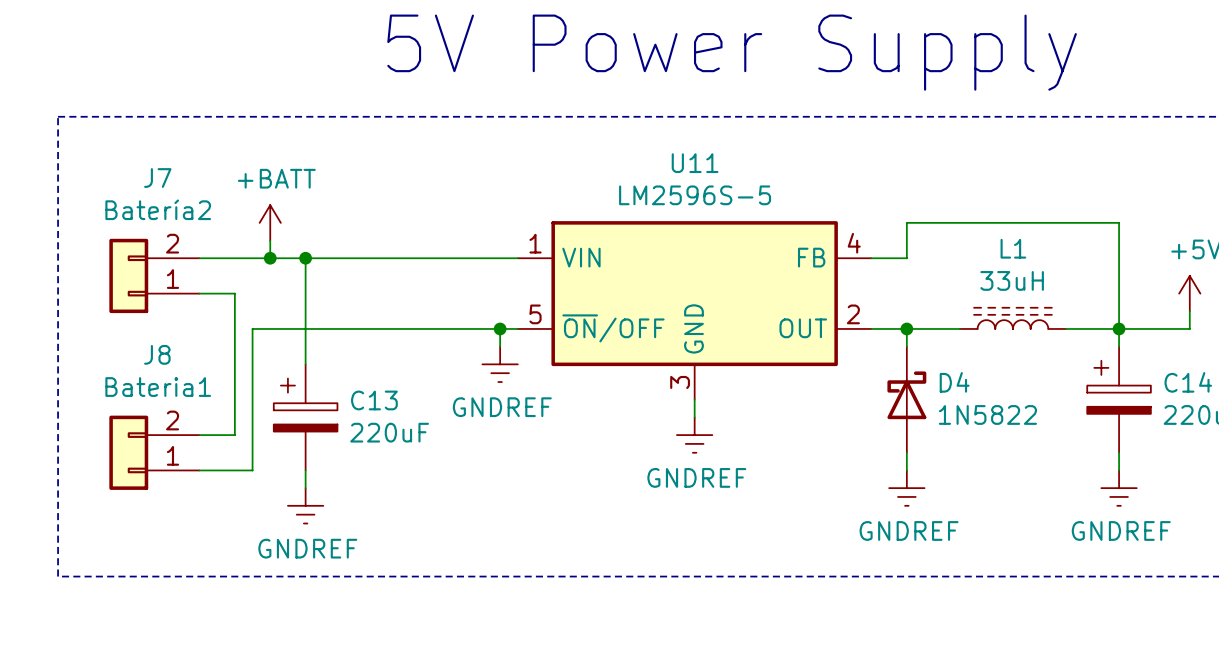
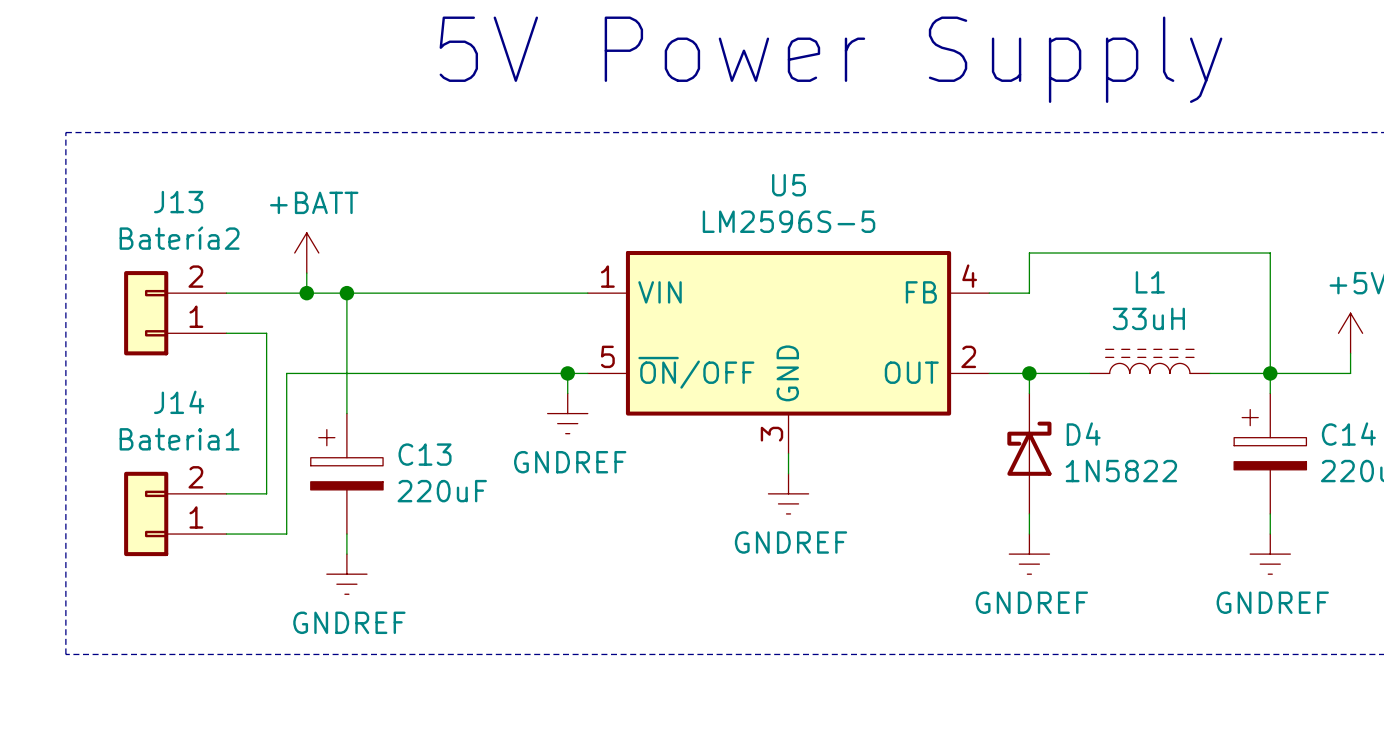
U11 name: U11 (695, 163) -> U5 (789, 185)
J7 name: J7 (157, 178) -> J13 (178, 202)
J8 name: J8 (157, 354) -> J14 (179, 402)

